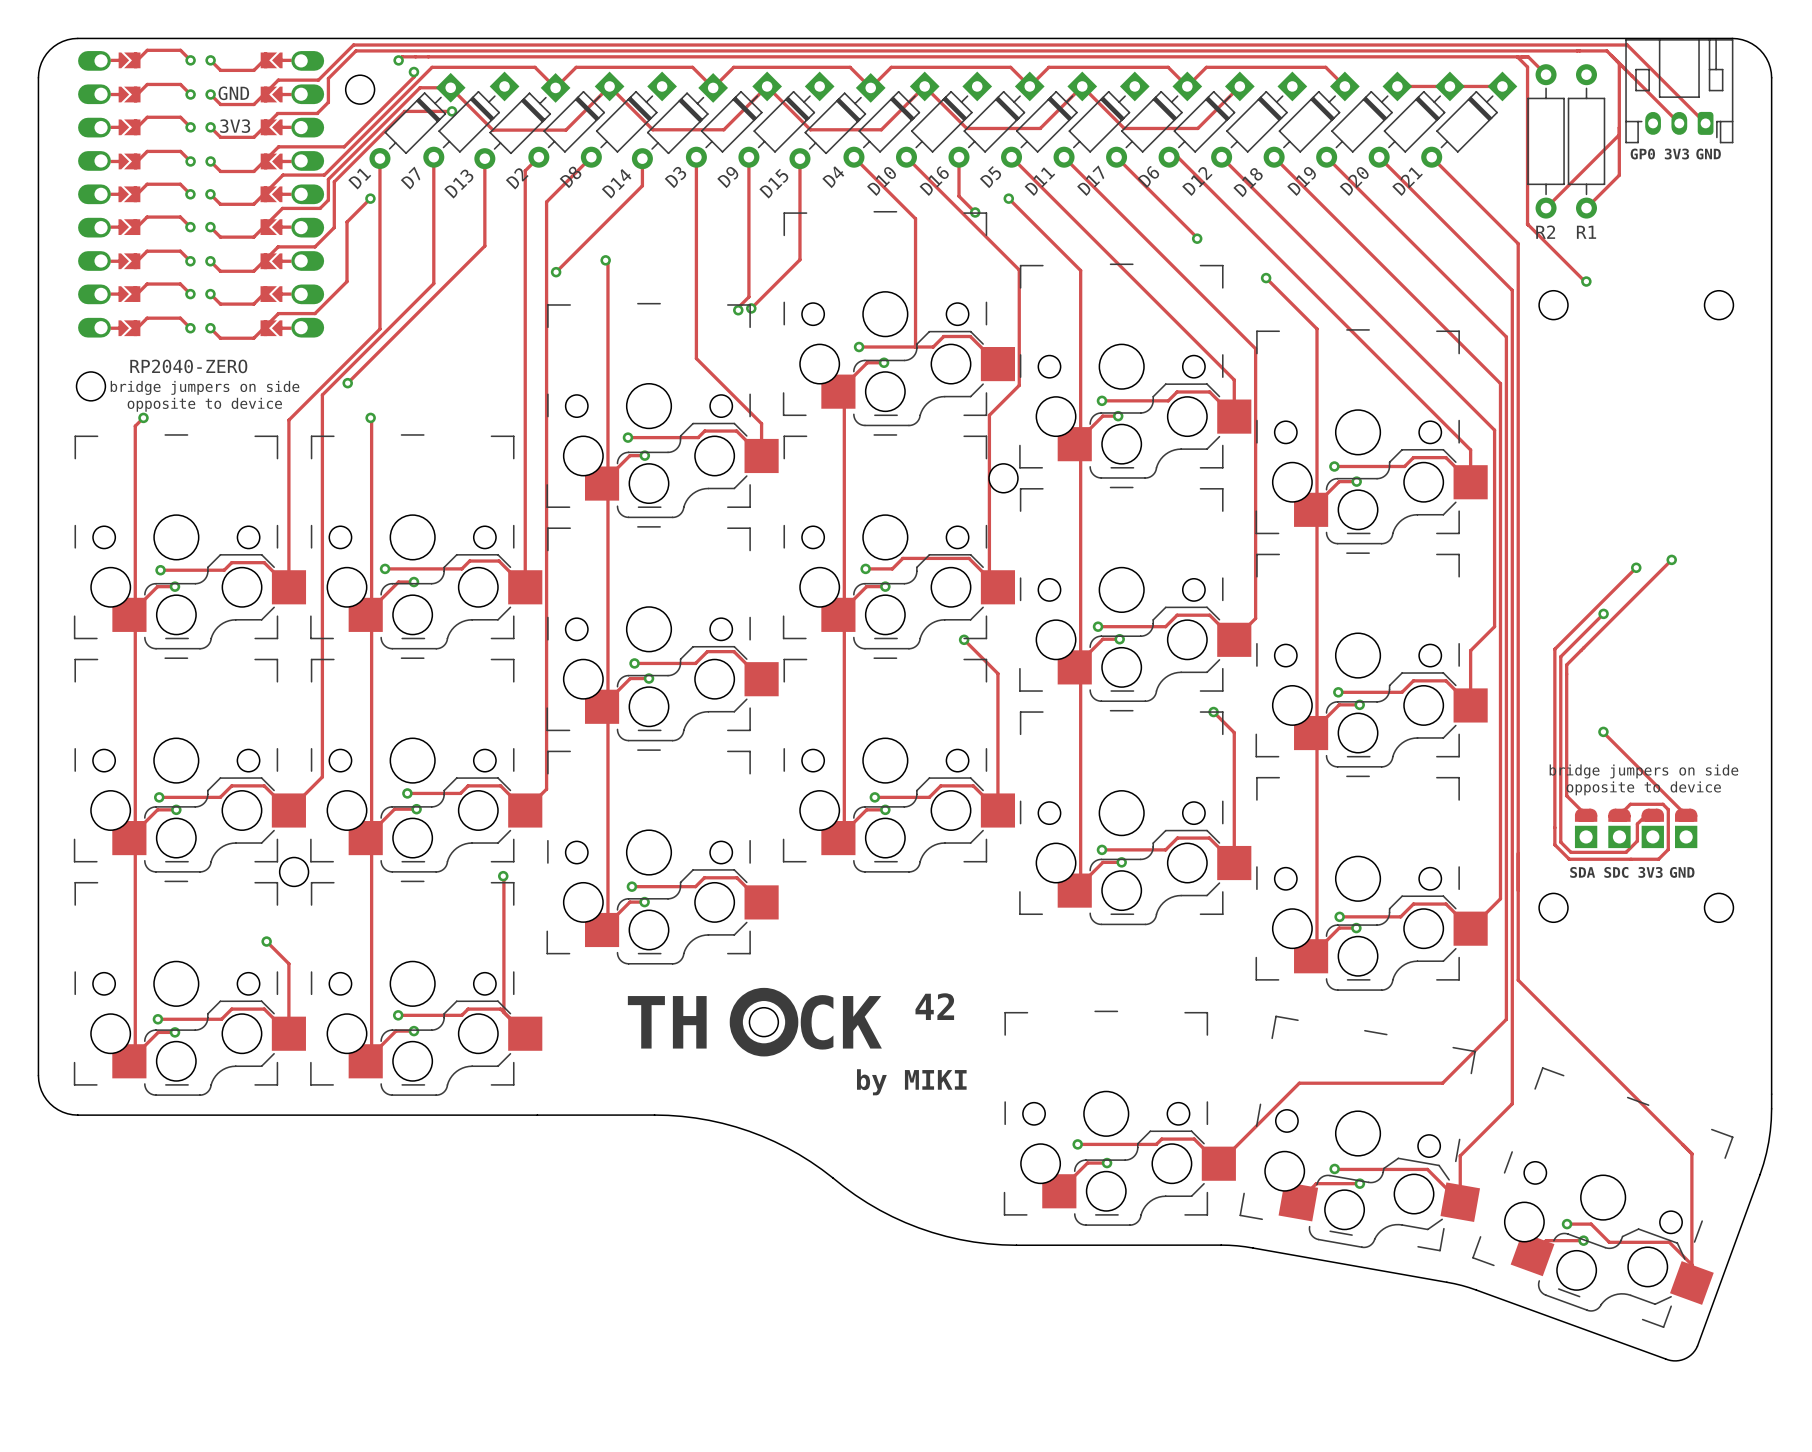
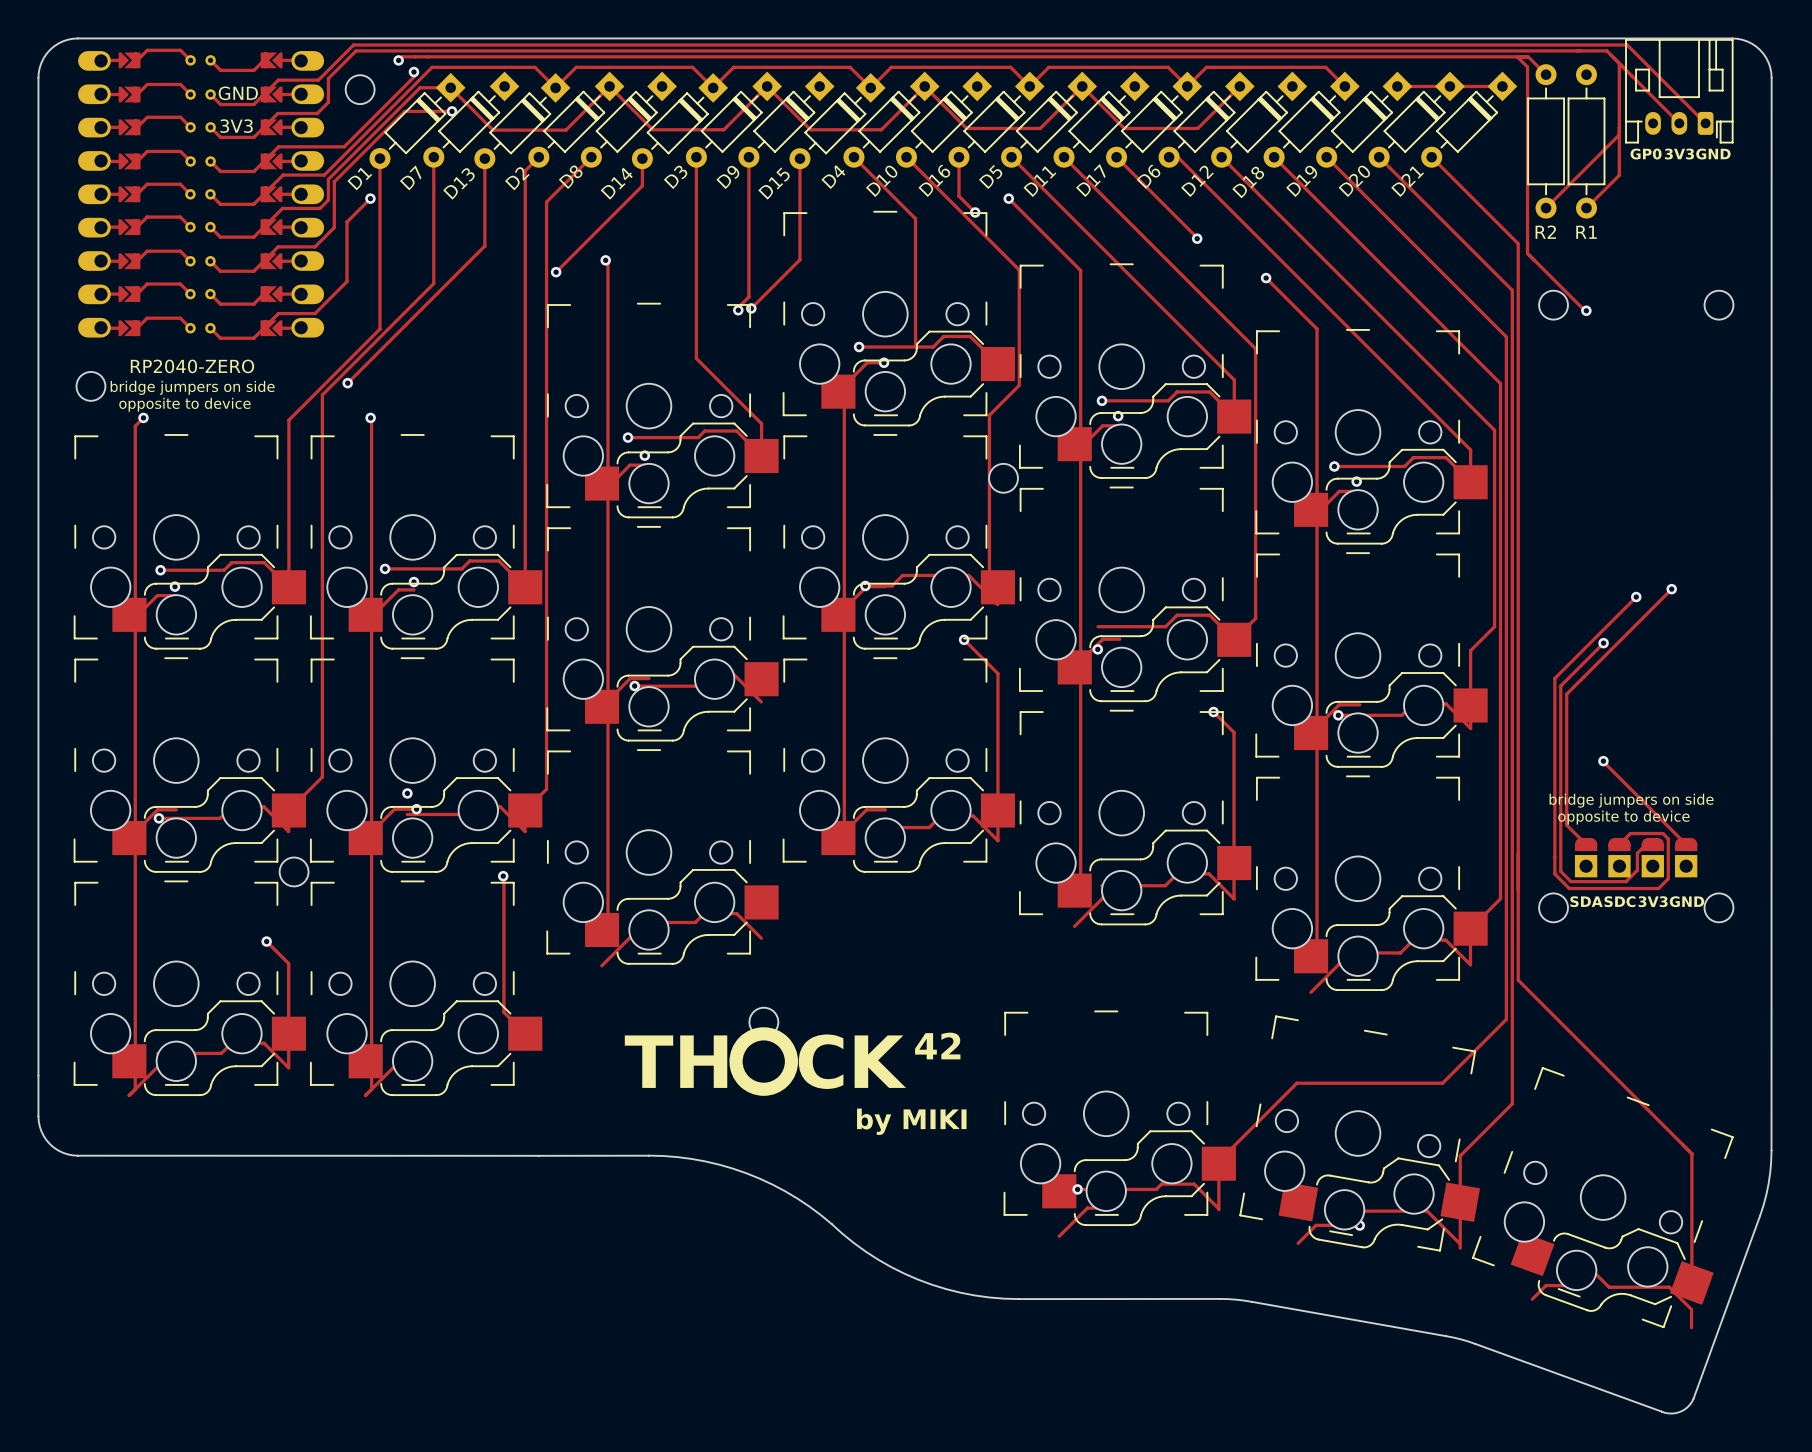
board edge: (1771, 77) (1771, 1120) (1766, 1153) (1760, 1174) (1697, 1346) (1686, 1358) (1678, 1360) (1668, 1359) (1461, 1285) (1253, 1248) (1221, 1245) (1002, 1244) (945, 1236) (905, 1222) (879, 1210) (855, 1195) (810, 1161) (774, 1141) (749, 1131) (709, 1120) (654, 1115) (72, 1114) (58, 1109) (46, 1099) (39, 1085) (38, 1075) -> (1771, 77) (1771, 1161) (1768, 1183) (1760, 1216) (1693, 1398) (1687, 1407) (1677, 1412) (1664, 1412) (1460, 1339) (1244, 1300) (1004, 1298) (960, 1292) (918, 1279) (891, 1267) (854, 1243) (809, 1206) (759, 1178) (705, 1161) (648, 1155)
track: (1527, 224) (1586, 281) -> (1527, 224) (1527, 253) (1586, 310)
via position: (1586, 281) -> (1586, 310)
track: (1118, 416) (1102, 416) (1080, 438) -> none
track: none -> (1118, 425) (1102, 425) (1074, 453)
track: (644, 455) (629, 455) (602, 483) (607, 489) -> none
track: none -> (644, 465) (629, 465) (602, 493)
track: (1356, 481) (1339, 481) (1317, 503) -> none
track: none -> (1356, 491) (1339, 491) (1311, 519)
track: (1671, 559) (1566, 664) (1566, 694) -> (1671, 589) (1566, 694)
via: (1671, 559) -> none
track: (1636, 567) (1554, 649) (1554, 678) -> (1636, 597) (1554, 678)
via: (1636, 567) -> none
track: (865, 568) (892, 568) (902, 558) (969, 558) (997, 587) -> (865, 585) (892, 585) (902, 575) (968, 575) (997, 604)
via: (865, 568) -> none
track: (413, 582) (398, 582) (371, 608) -> none
via: none -> (865, 585)
track: (174, 586) (157, 586) (135, 608) -> none
via: (885, 586) -> none
track: none -> (413, 589) (398, 589) (365, 622)
via: none -> (1671, 589)
track: none -> (174, 595) (157, 595) (129, 623)
via: none -> (1636, 597)
track: (1603, 613) (1560, 656) (1560, 685) -> (1603, 643) (1560, 685)
via: (1603, 613) -> none
via: (1098, 626) -> none
via: (1119, 639) -> none
via: none -> (1603, 643)
via: none -> (1097, 649)
track: (634, 663) (695, 663) (707, 651) (734, 651) (761, 679) -> (634, 686) (695, 686) (707, 674) (733, 674) (761, 701)
via: (634, 663) -> none
via: (649, 678) -> none
via: none -> (634, 686)
track: (1338, 692) (1402, 692) (1413, 680) (1446, 680) (1470, 705) -> (1338, 715) (1402, 715) (1413, 703) (1446, 703) (1470, 728) (1470, 705)
via: (1338, 692) -> none
via: (1359, 704) -> none
via: none -> (1338, 715)
track: (1603, 731) (1686, 815) -> (1603, 761) (1686, 844)
via position: (1603, 731) -> (1603, 761)
track: (1234, 732) (1234, 863) (1209, 838) (1177, 838) (1165, 849) (1101, 849) -> (1234, 732) (1234, 898) (1209, 873) (1177, 873) (1165, 885) (1101, 885)
text position: bridge jumpers on side (1643, 771) -> bridge jumpers on side (1631, 800)
text position: opposite to device (1643, 788) -> opposite to device (1623, 817)
track: (407, 793) (460, 793) (468, 785) (500, 785) (525, 810) -> (407, 814) (460, 814) (467, 806) (500, 806) (524, 831) (525, 810)
track: (1566, 795) (1586, 815) -> (1566, 795) (1566, 825) (1586, 844)
track: (159, 797) (220, 797) (231, 785) (264, 785) (288, 810) -> (158, 818) (220, 818) (231, 806) (264, 806) (288, 831) (288, 810)
via: (159, 797) -> none
track: (874, 797) (929, 797) (940, 785) (973, 785) (997, 810) -> (874, 827) (929, 827) (940, 816) (973, 816) (997, 840) (997, 810)
via: (874, 797) -> none
via: (176, 809) -> none
via: (885, 809) -> none
track: (1619, 815) (1630, 804) (1662, 804) (1668, 809) (1668, 838) -> (1619, 844) (1630, 833) (1662, 833) (1668, 838)
track: (1652, 815) (1646, 815) (1637, 824) (1637, 841) (1626, 852) (1570, 852) (1560, 842) -> (1652, 844) (1646, 844) (1637, 853) (1637, 870) (1626, 881) (1570, 881) (1560, 871) (1560, 842)
via: none -> (158, 818)
part position: (1636, 828) -> (1636, 857)
track: (1554, 844) (1569, 859) (1658, 859) (1668, 849) -> (1554, 844) (1554, 874) (1569, 888) (1658, 888) (1668, 878) (1668, 849)
via: (1101, 849) -> none
track: (1121, 862) (1102, 862) (1074, 890) -> none
via: (1121, 862) -> none
text position: SDA (1582, 872) -> SDA (1586, 901)
text position: SDC (1616, 872) -> SDC (1619, 901)
text position: 3V3 (1650, 872) -> 3V3 (1653, 901)
text position: GND (1682, 872) -> GND (1686, 901)
track: (631, 886) (695, 886) (704, 877) (736, 877) (761, 902) -> (631, 922) (695, 922) (704, 913) (736, 913) (761, 938)
via: (631, 886) -> none
track: none -> (1121, 898) (1102, 898) (1074, 926)
track: (644, 902) (629, 902) (602, 929) -> (644, 937) (629, 937) (601, 965)
via: (644, 902) -> none
track: (1339, 916) (1400, 916) (1413, 904) (1446, 904) (1470, 928) -> (1339, 952) (1400, 952) (1413, 940) (1445, 940) (1470, 964) (1470, 928)
via: (1339, 916) -> none
track: (1356, 928) (1339, 928) (1311, 956) -> (1356, 964) (1339, 964) (1310, 992)
via: (1356, 928) -> none
track: (288, 963) (288, 1033) (264, 1009) (231, 1009) (221, 1019) (157, 1019) -> (288, 963) (288, 1067) (264, 1043) (231, 1043) (221, 1053) (157, 1053)
text position: 42 (934, 1006) -> 42 (937, 1046)
track: (503, 1012) (500, 1009) (468, 1009) (461, 1015) (398, 1015) -> none
via: (398, 1015) -> none
via: (157, 1019) -> none
text position: TH (667, 1022) -> TH (676, 1061)
drawing position: (764, 1022) -> (763, 1061)
text position: CK (841, 1022) -> CK (852, 1061)
track: (413, 1031) (395, 1031) (365, 1061) -> (413, 1065) (395, 1065) (365, 1095)
via: (413, 1031) -> none
track: (175, 1032) (158, 1032) (129, 1061) -> (174, 1066) (158, 1066) (129, 1095)
via: (175, 1032) -> none
board edge: none -> (38, 1075) (38, 1116) (41, 1131) (53, 1147) (72, 1155) (648, 1155)
text position: by MIKI (911, 1082) -> by MIKI (911, 1121)
track: (1299, 1083) (1218, 1163) (1194, 1139) (1161, 1139) (1156, 1144) (1077, 1144) -> (1299, 1083) (1296, 1083) (1218, 1161) (1218, 1209)
via: (1077, 1144) -> none
track: (1107, 1163) (1087, 1163) (1059, 1191) -> (1106, 1208) (1087, 1208) (1059, 1236)
via: (1107, 1163) -> none
track: (1334, 1168) (1427, 1169) (1460, 1202) -> (1460, 1248) (1460, 1202)
via: (1334, 1168) -> none
track: (1359, 1183) (1316, 1183) (1298, 1201) -> (1359, 1225) (1316, 1225) (1298, 1243)
via: (1359, 1183) -> none
track: none -> (1077, 1189) (1156, 1189) (1161, 1184) (1194, 1184) (1218, 1208)
via: none -> (1077, 1189)
track: none -> (1334, 1211) (1427, 1211) (1460, 1243)
track: (1567, 1224) (1591, 1224) (1609, 1242) (1669, 1242) (1691, 1264) -> none
via: (1567, 1224) -> none
via: none -> (1359, 1225)
track: (1583, 1240) (1546, 1240) (1532, 1254) -> (1583, 1285) (1545, 1285) (1532, 1299)
via: (1583, 1240) -> none
track: none -> (1566, 1269) (1590, 1269) (1609, 1287) (1669, 1287) (1691, 1309) (1691, 1327)

